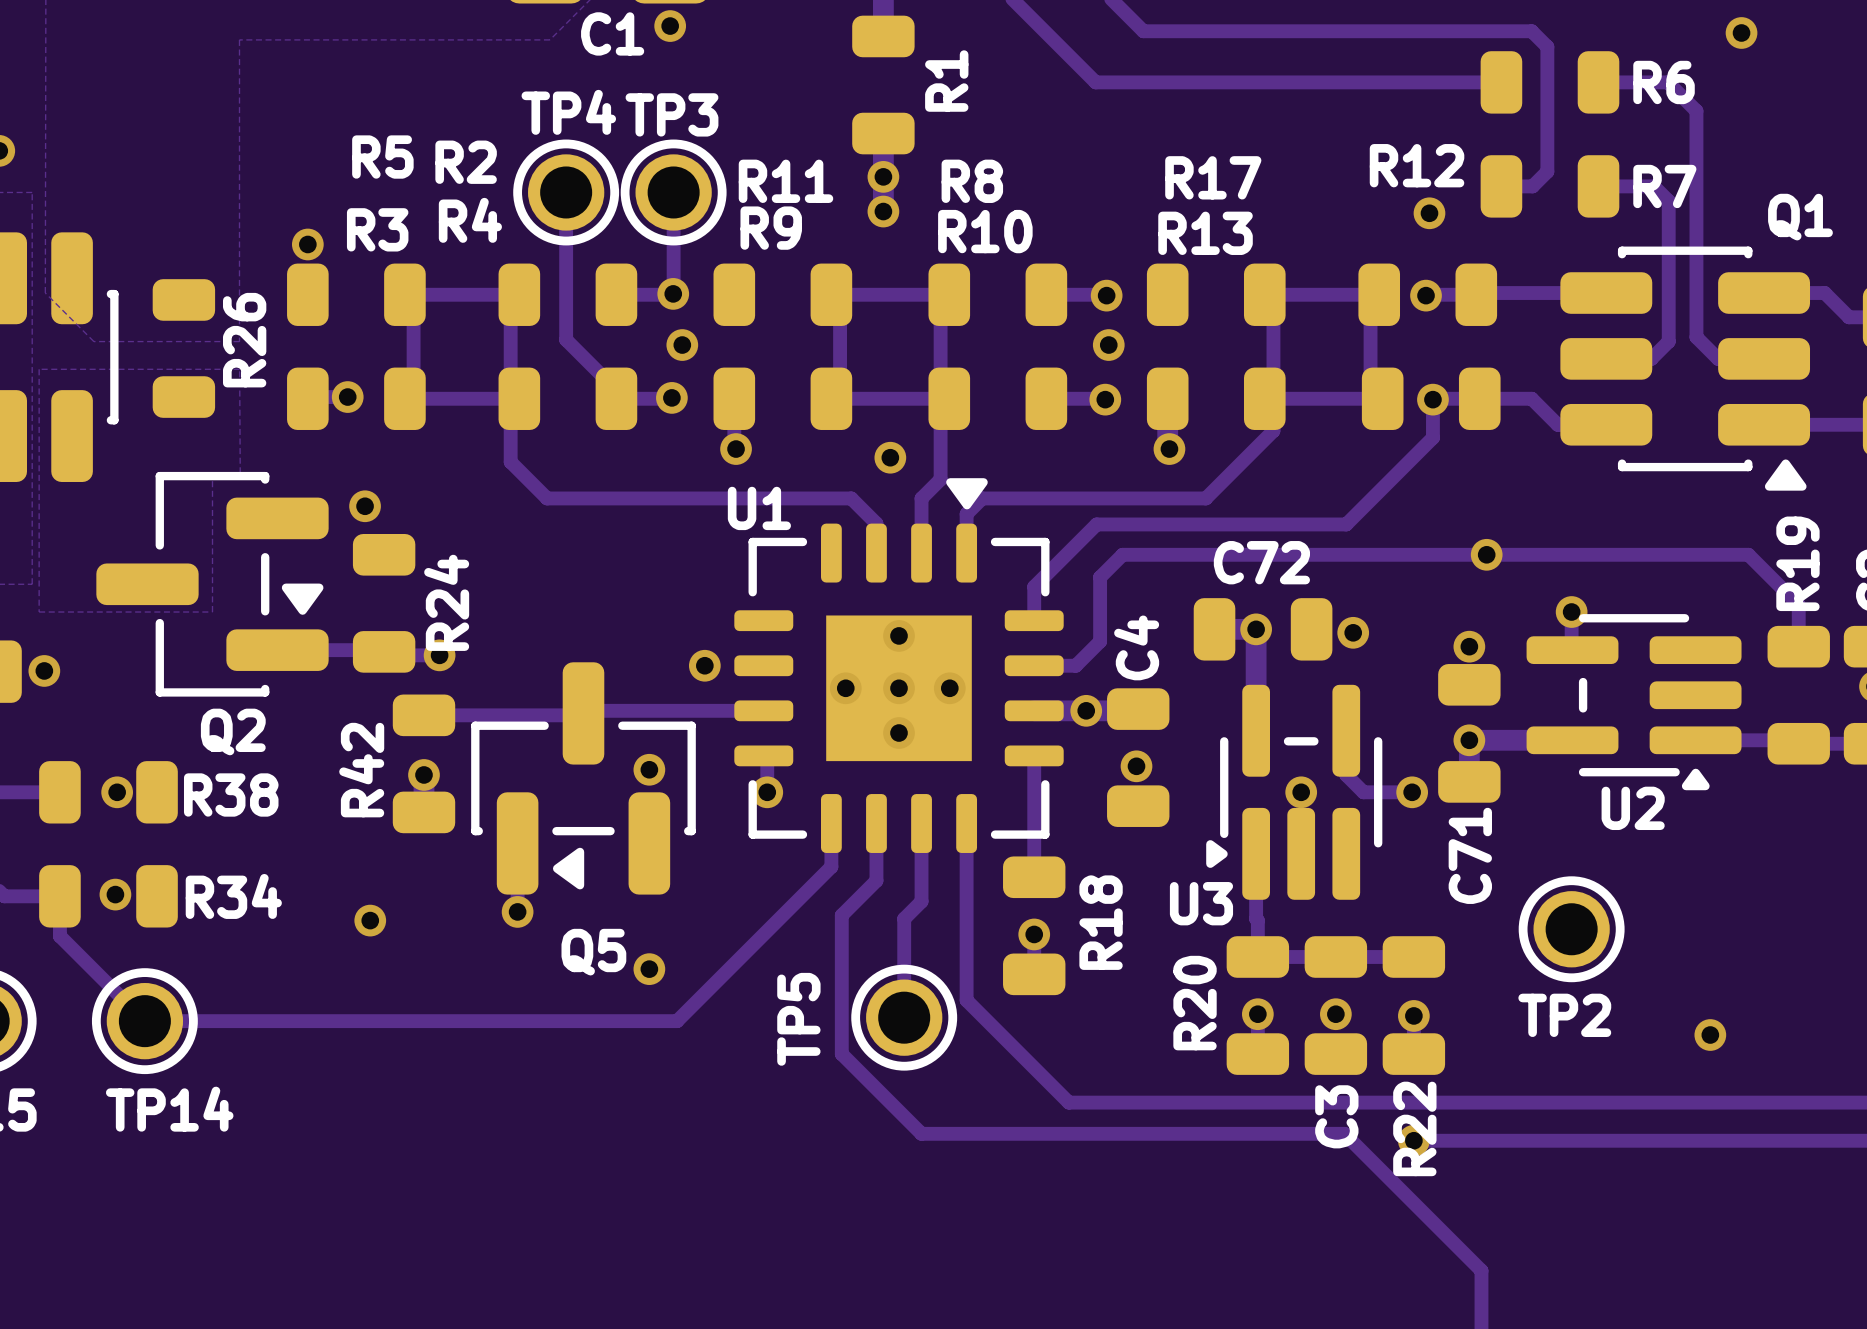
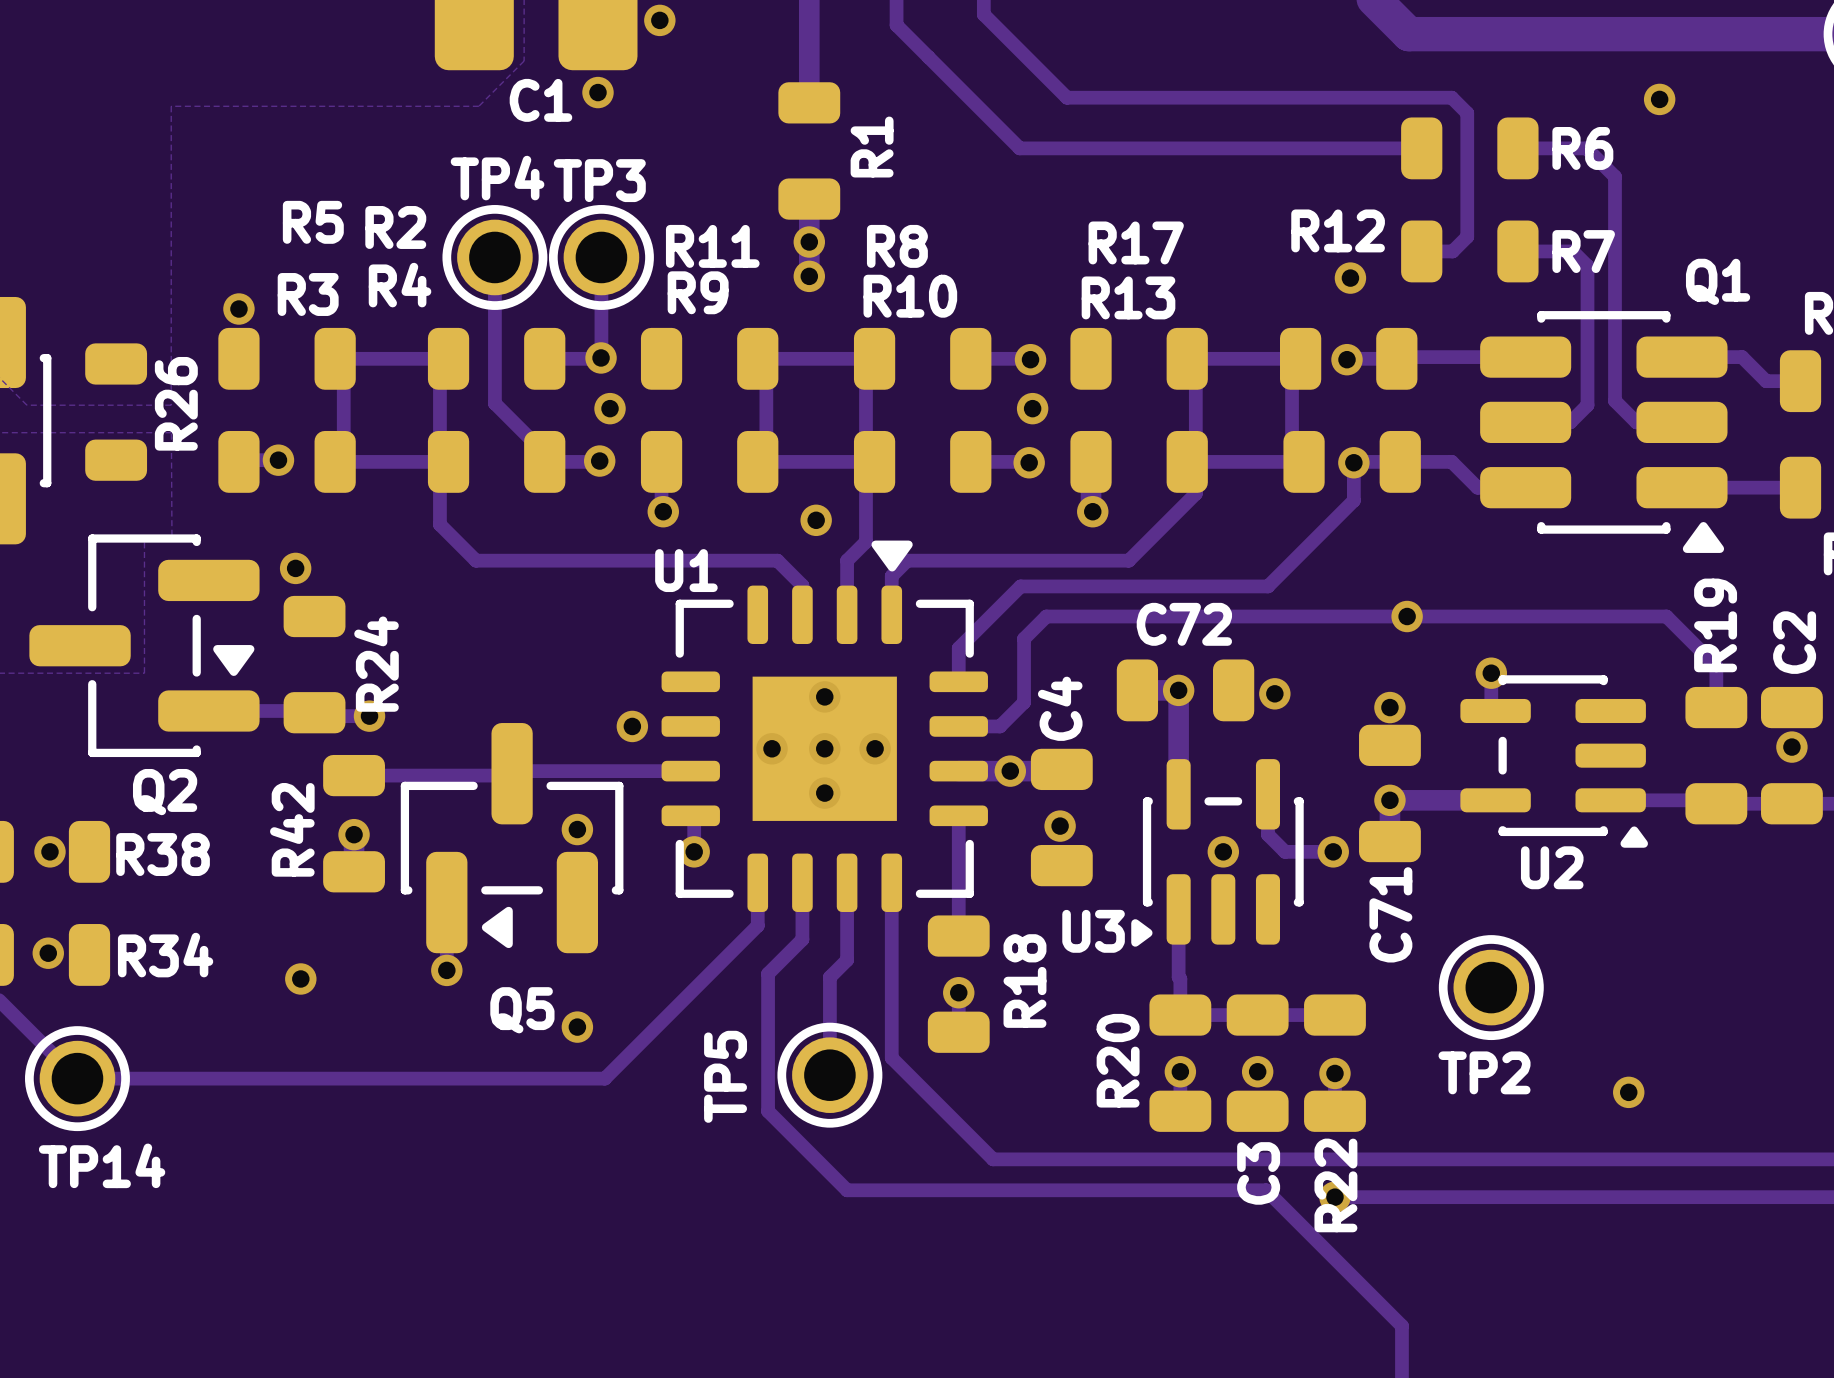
U2 footprint: [1526, 614, 1742, 791] -> [1460, 675, 1648, 848]
U3 footprint: [1206, 684, 1383, 900] -> [1131, 759, 1304, 947]
U3 name position: U3 (1201, 903) -> U3 (1093, 931)

